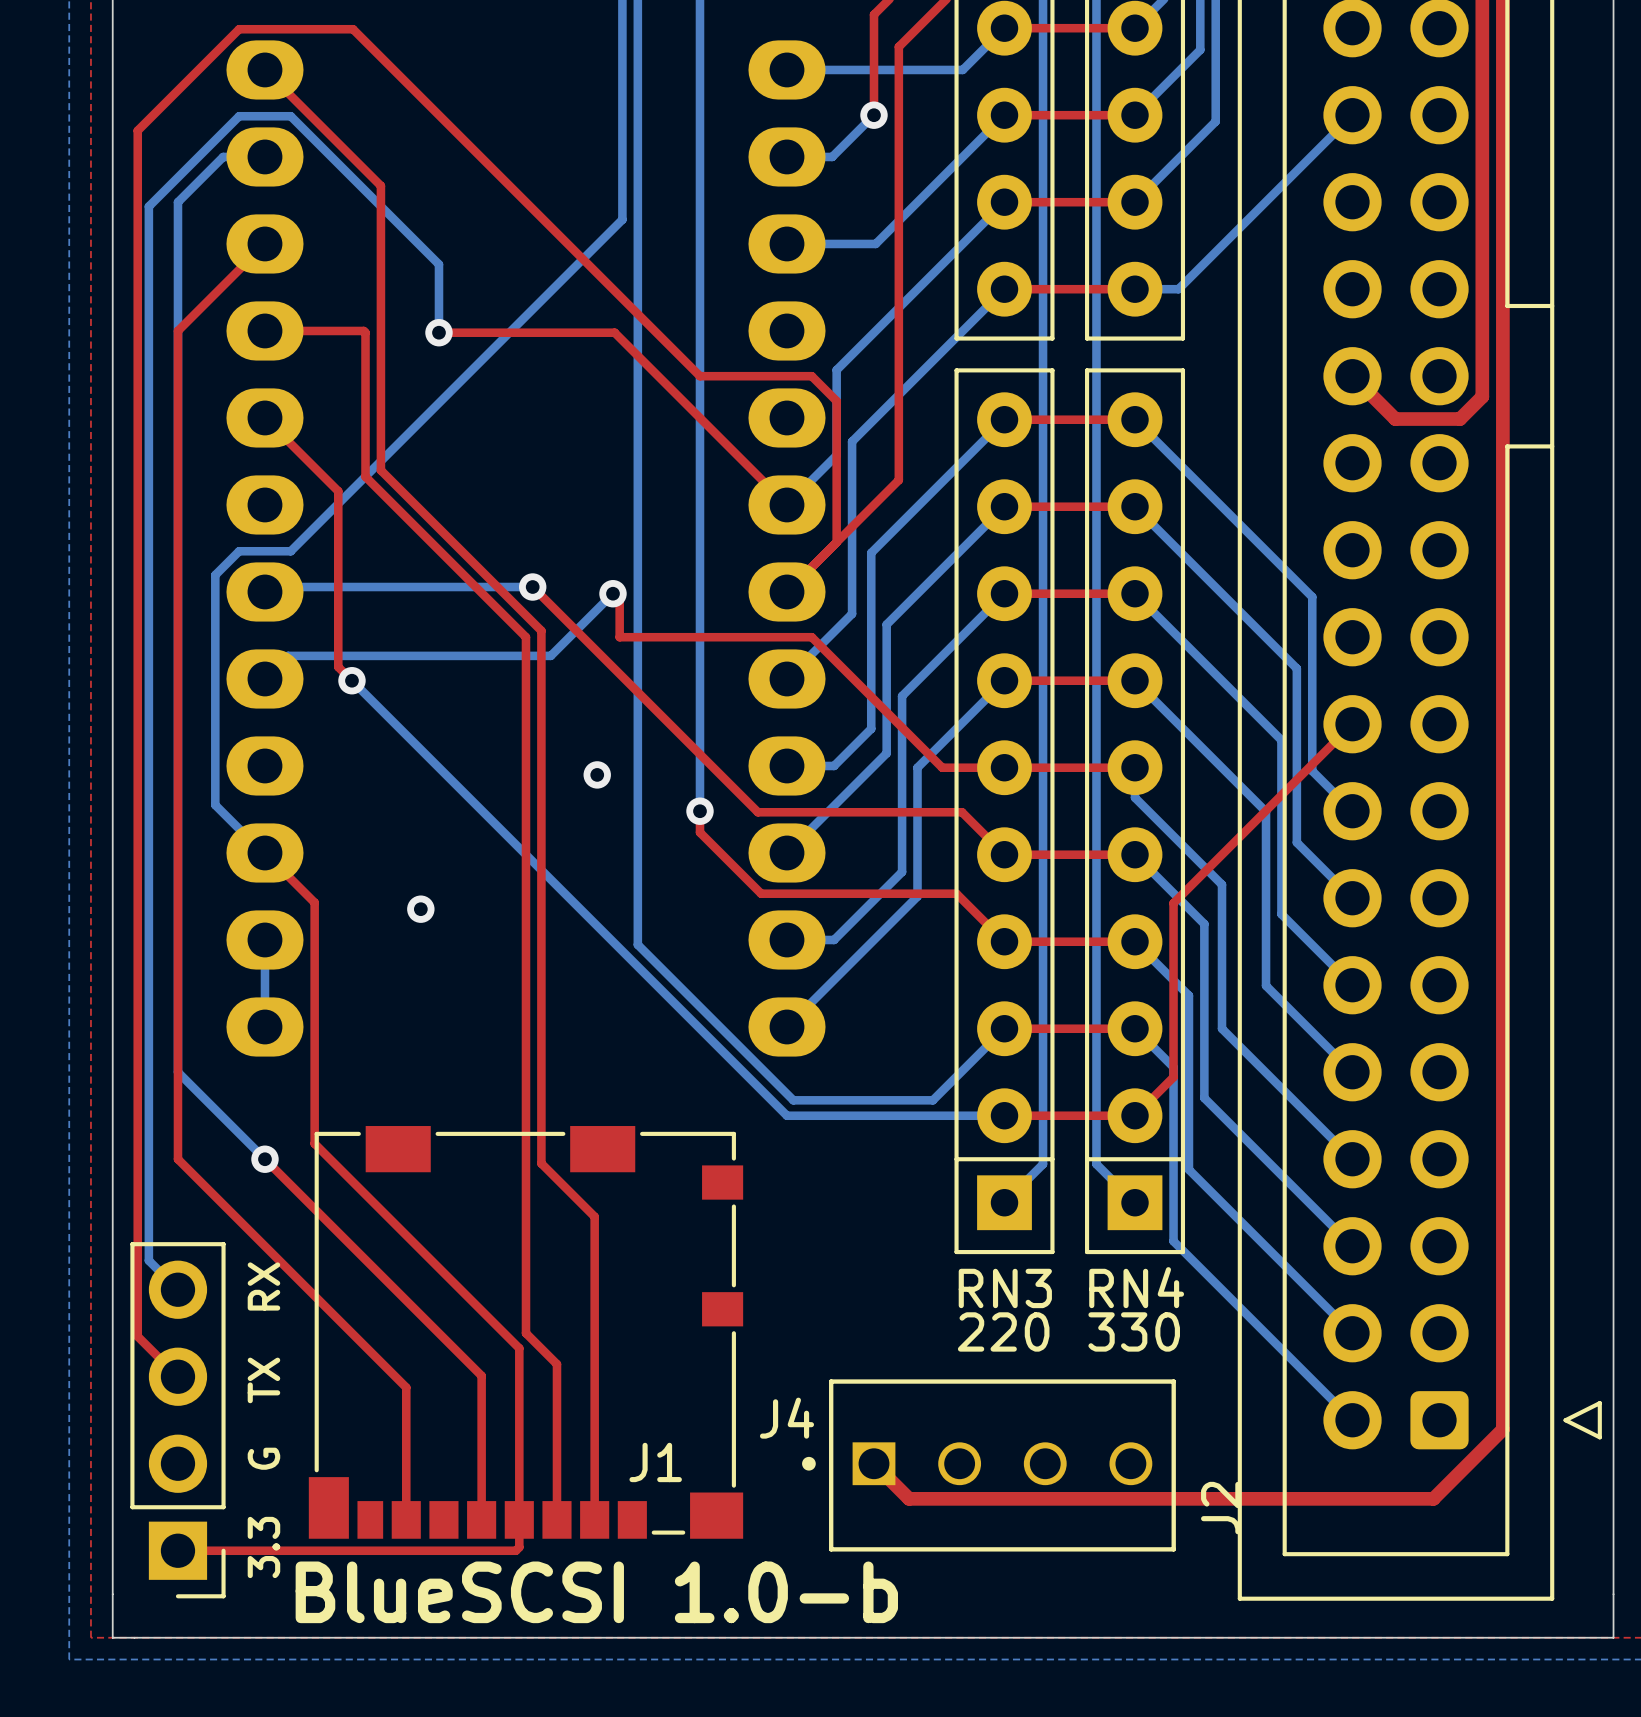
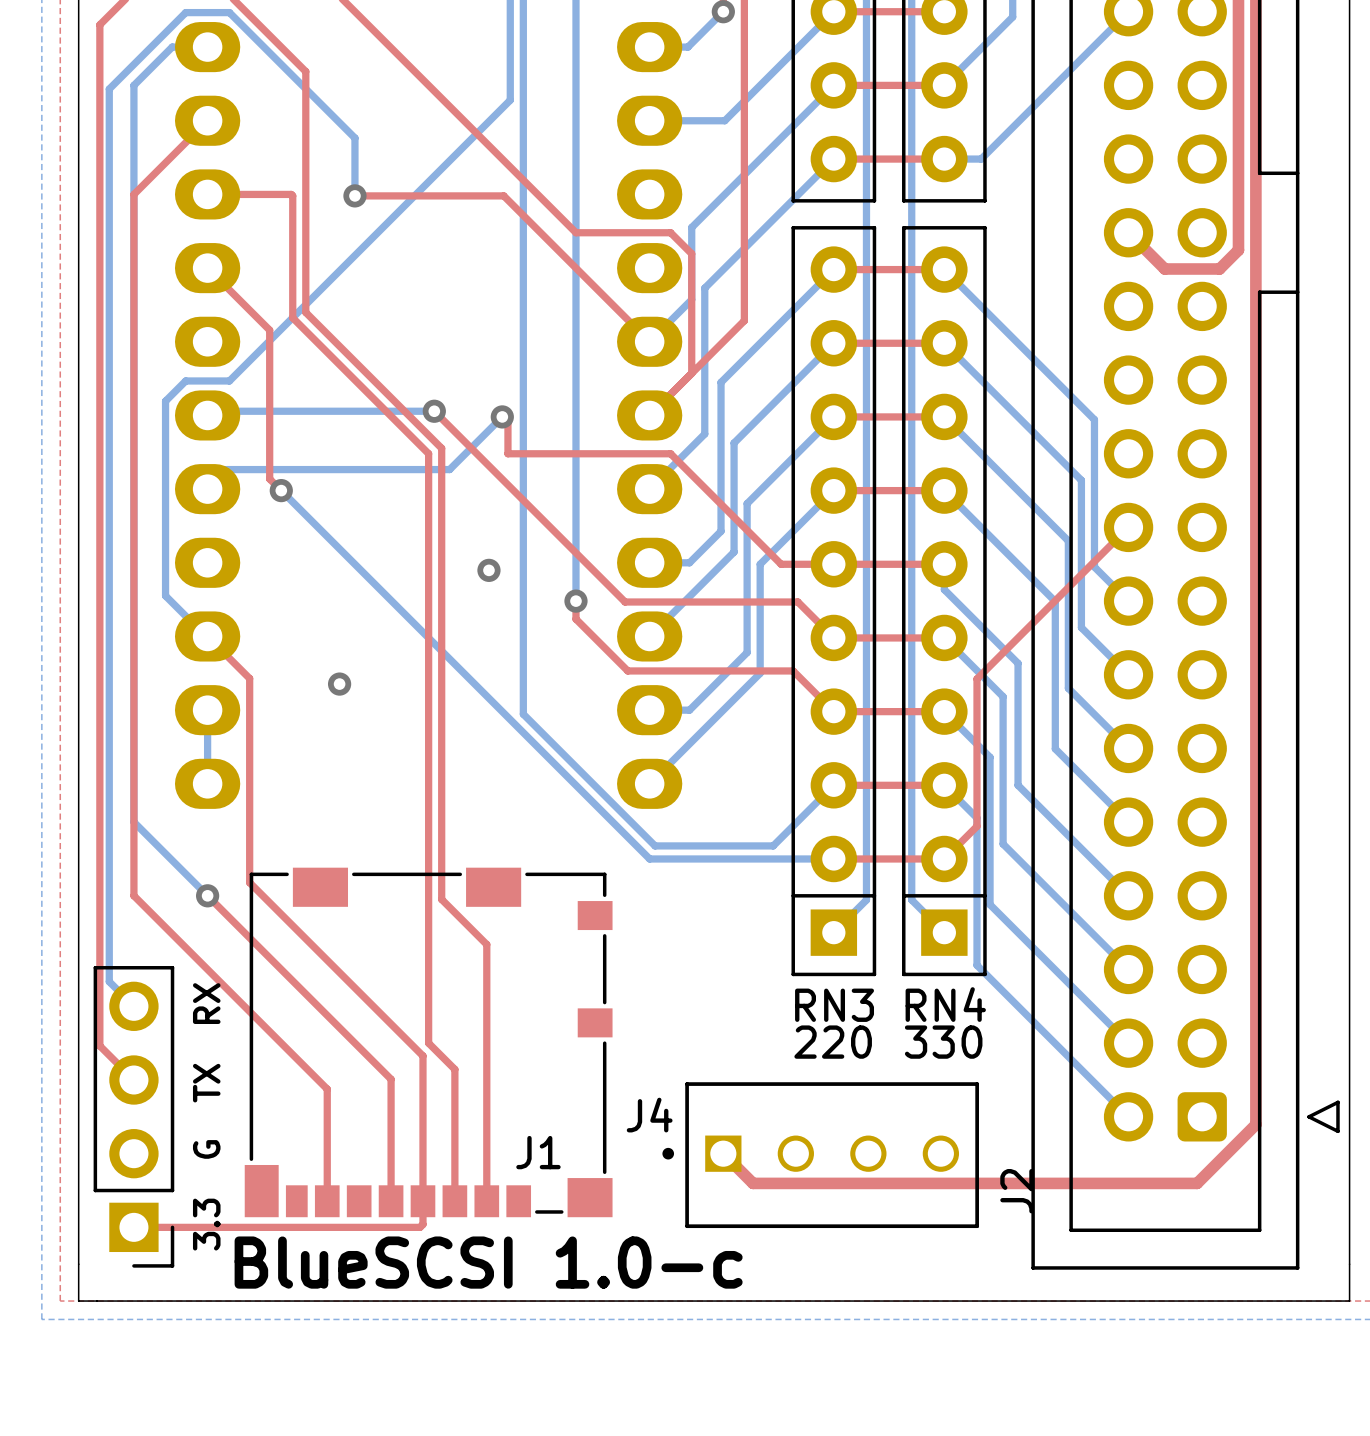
text: BlueSCSI 1.0-b (596, 1592) -> BlueSCSI 1.0-c (488, 1262)

